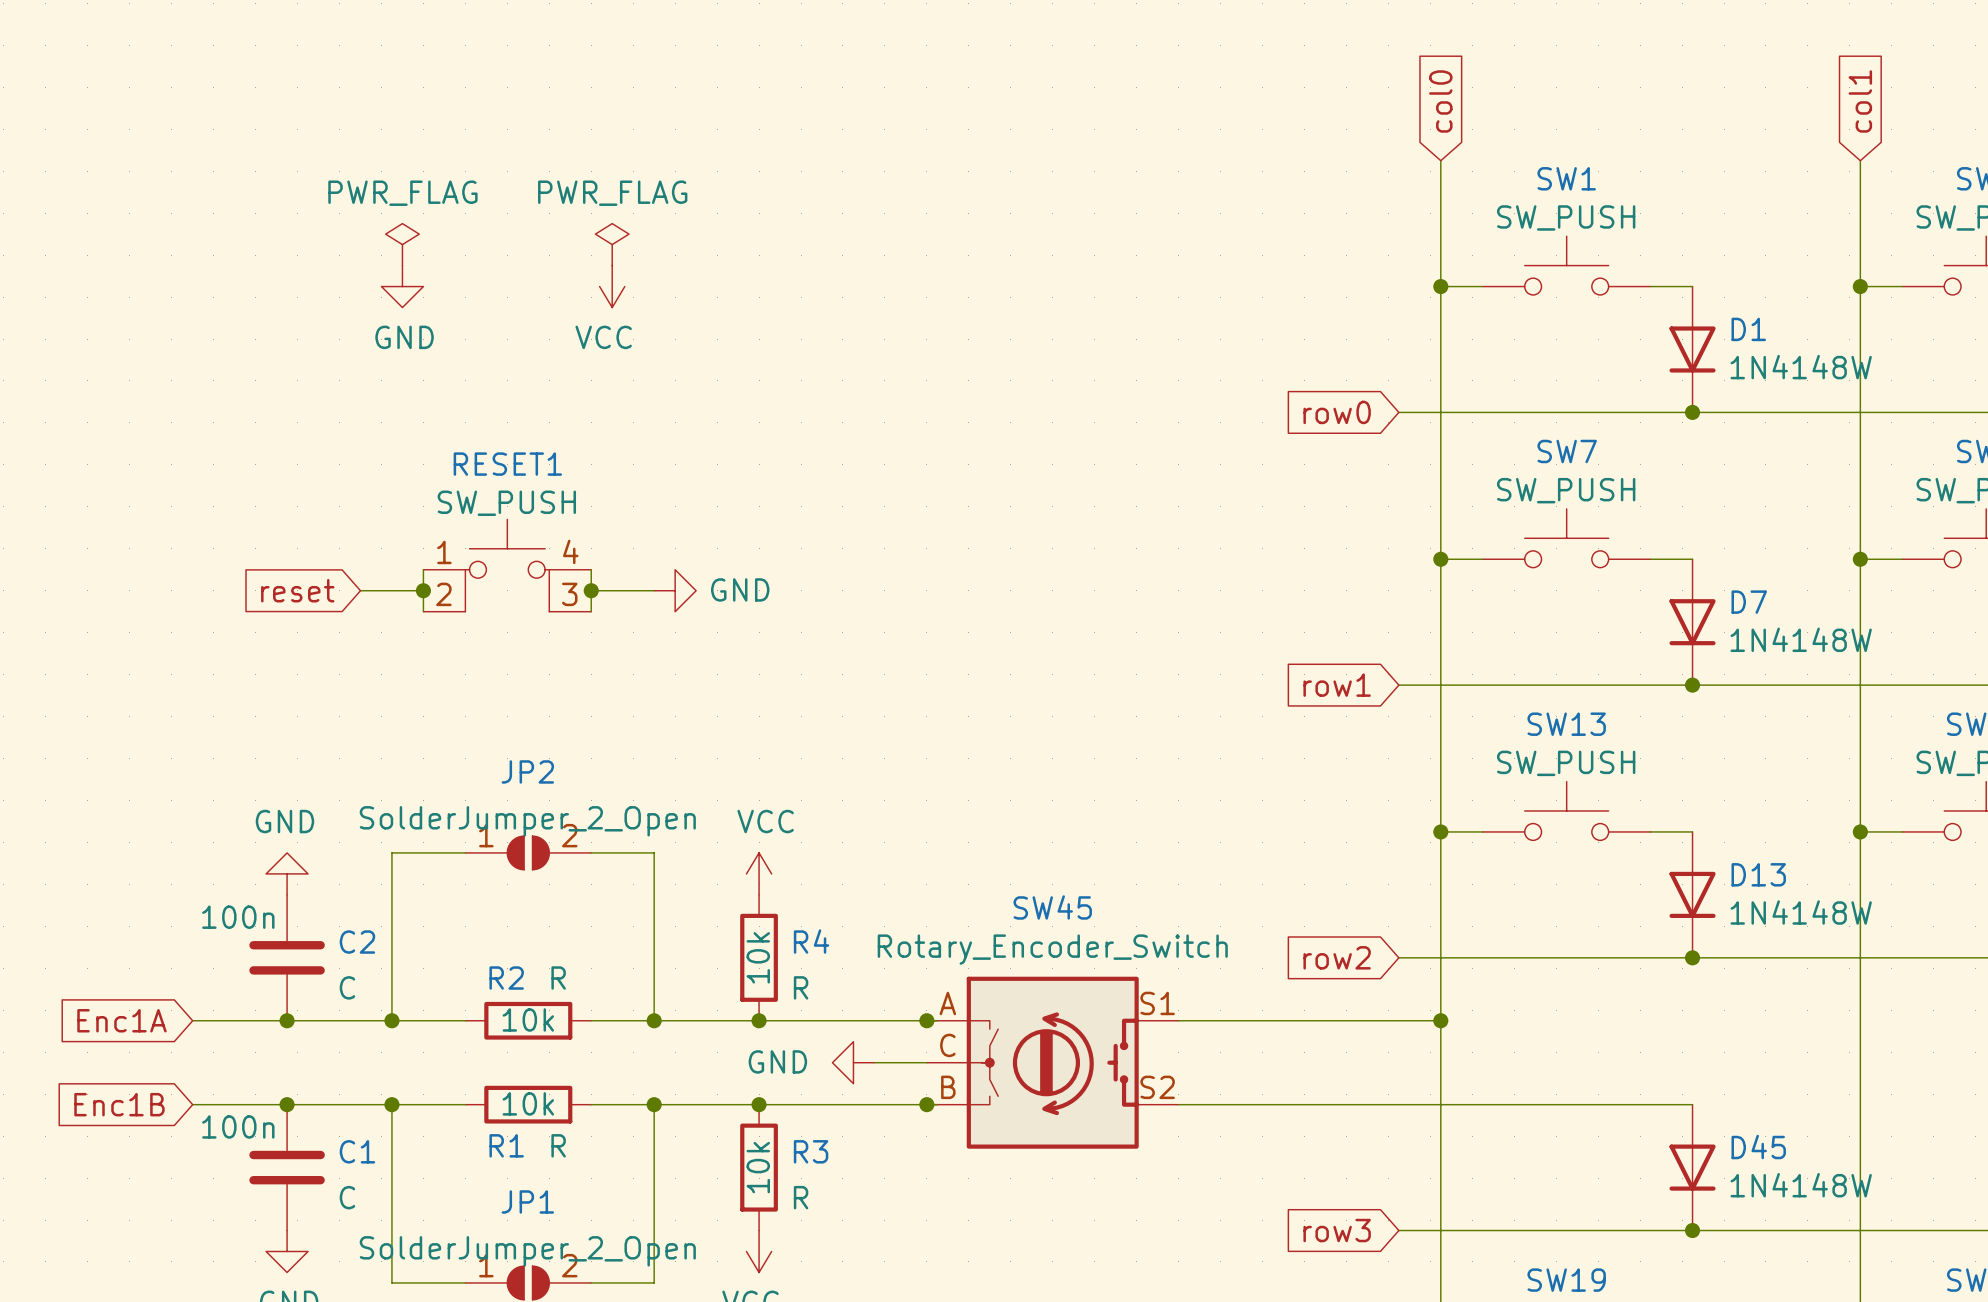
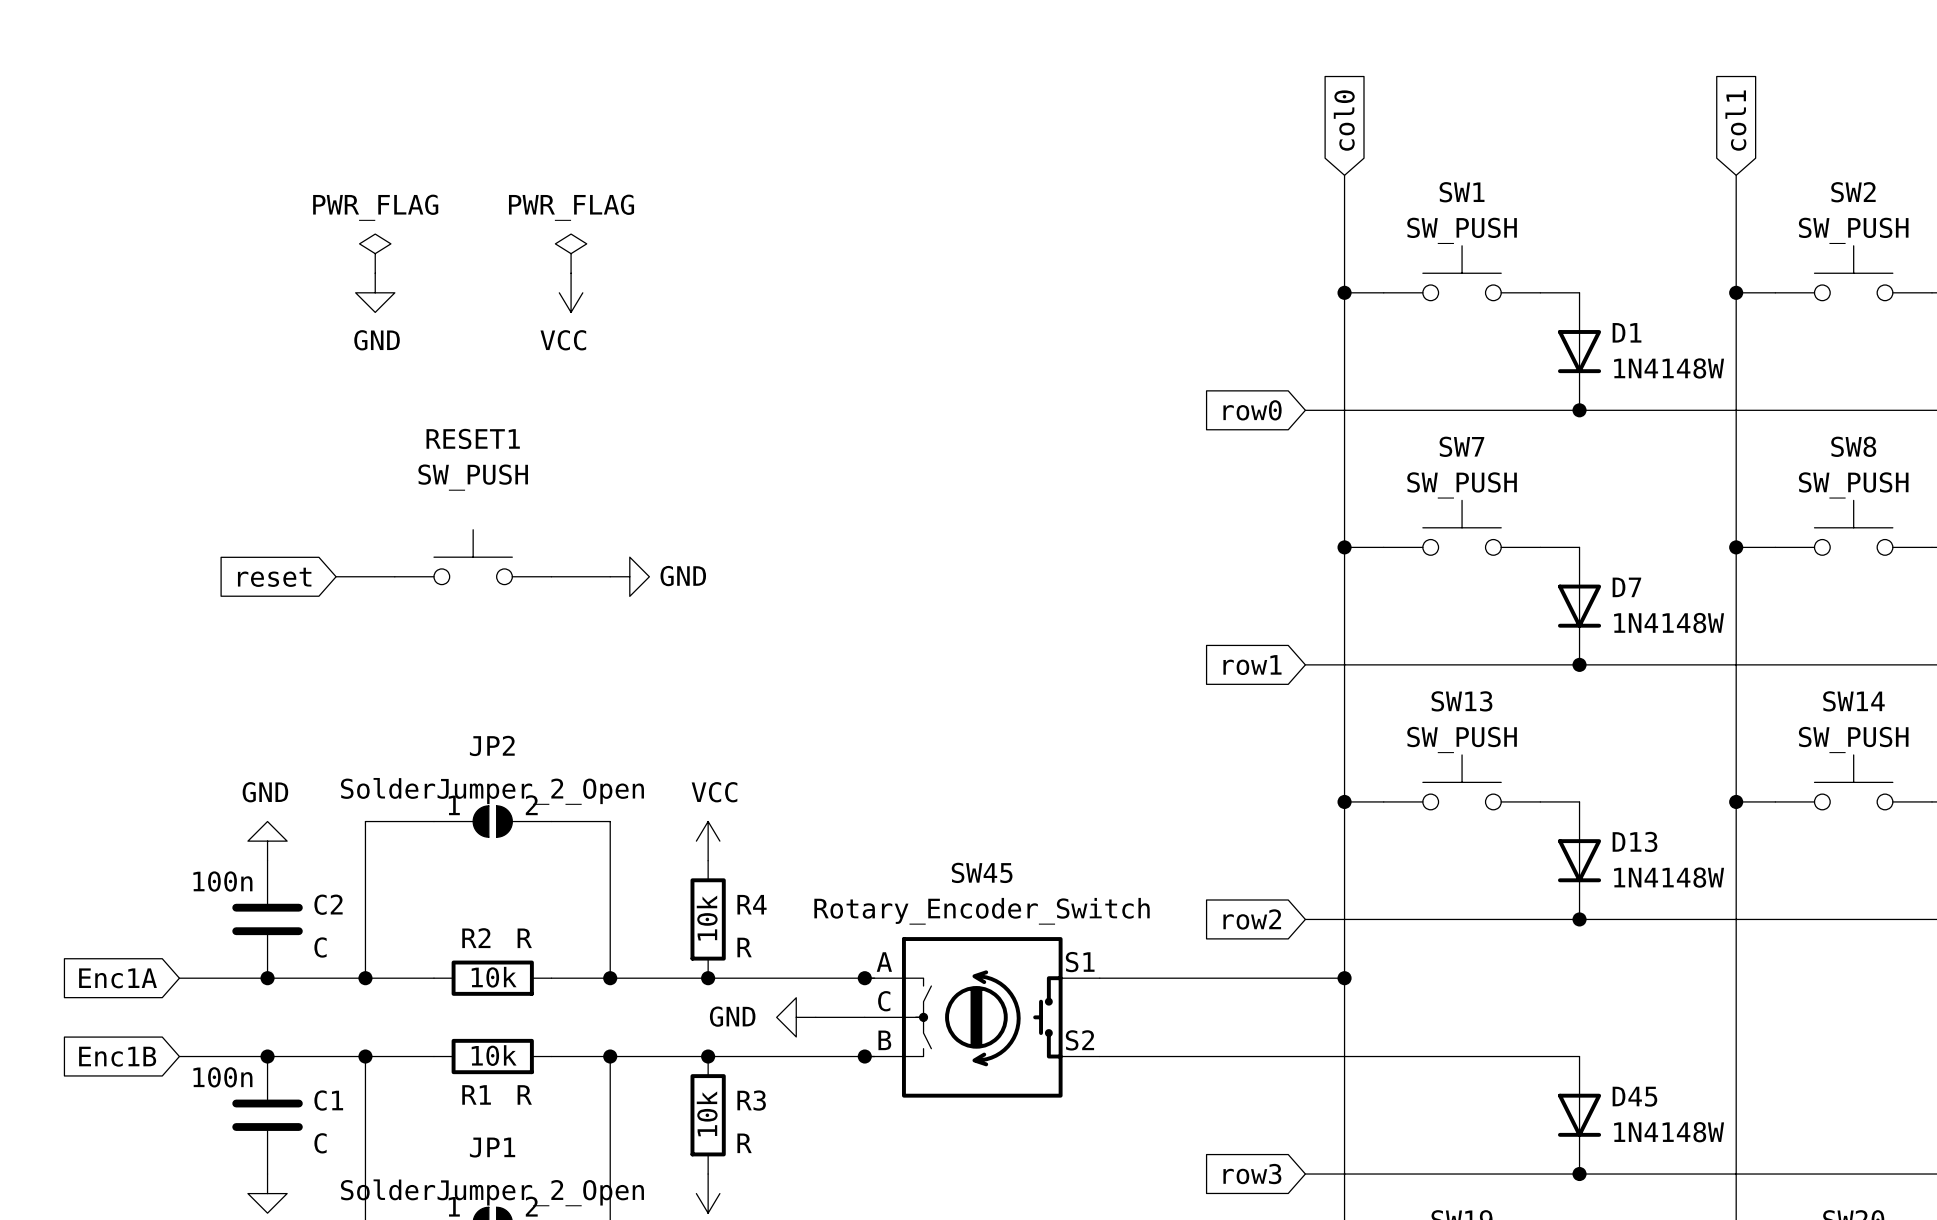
RESET1 symbol: [423, 519, 592, 612] -> [394, 529, 552, 585]
wire: (423, 569) (423, 611) -> none
wire: (591, 569) (591, 611) -> none
junction: (423, 590) -> none
junction: (591, 590) -> none

